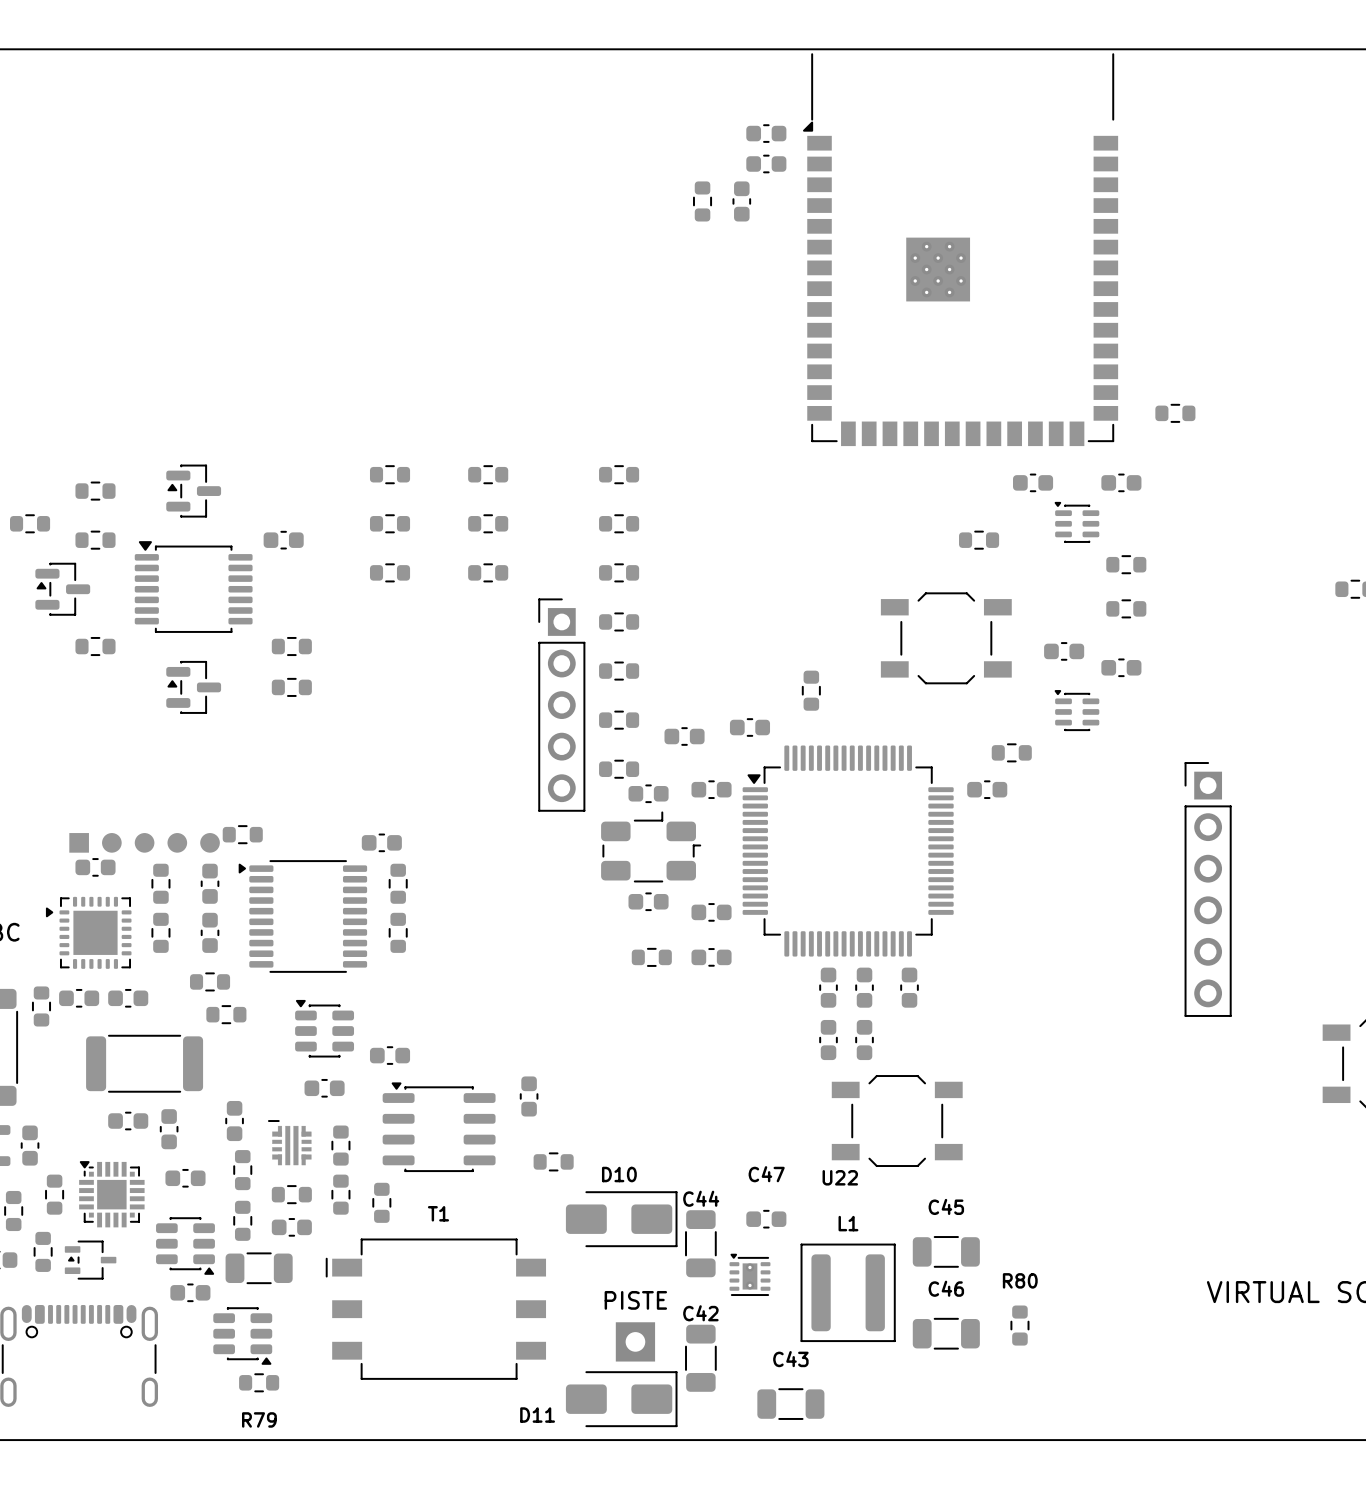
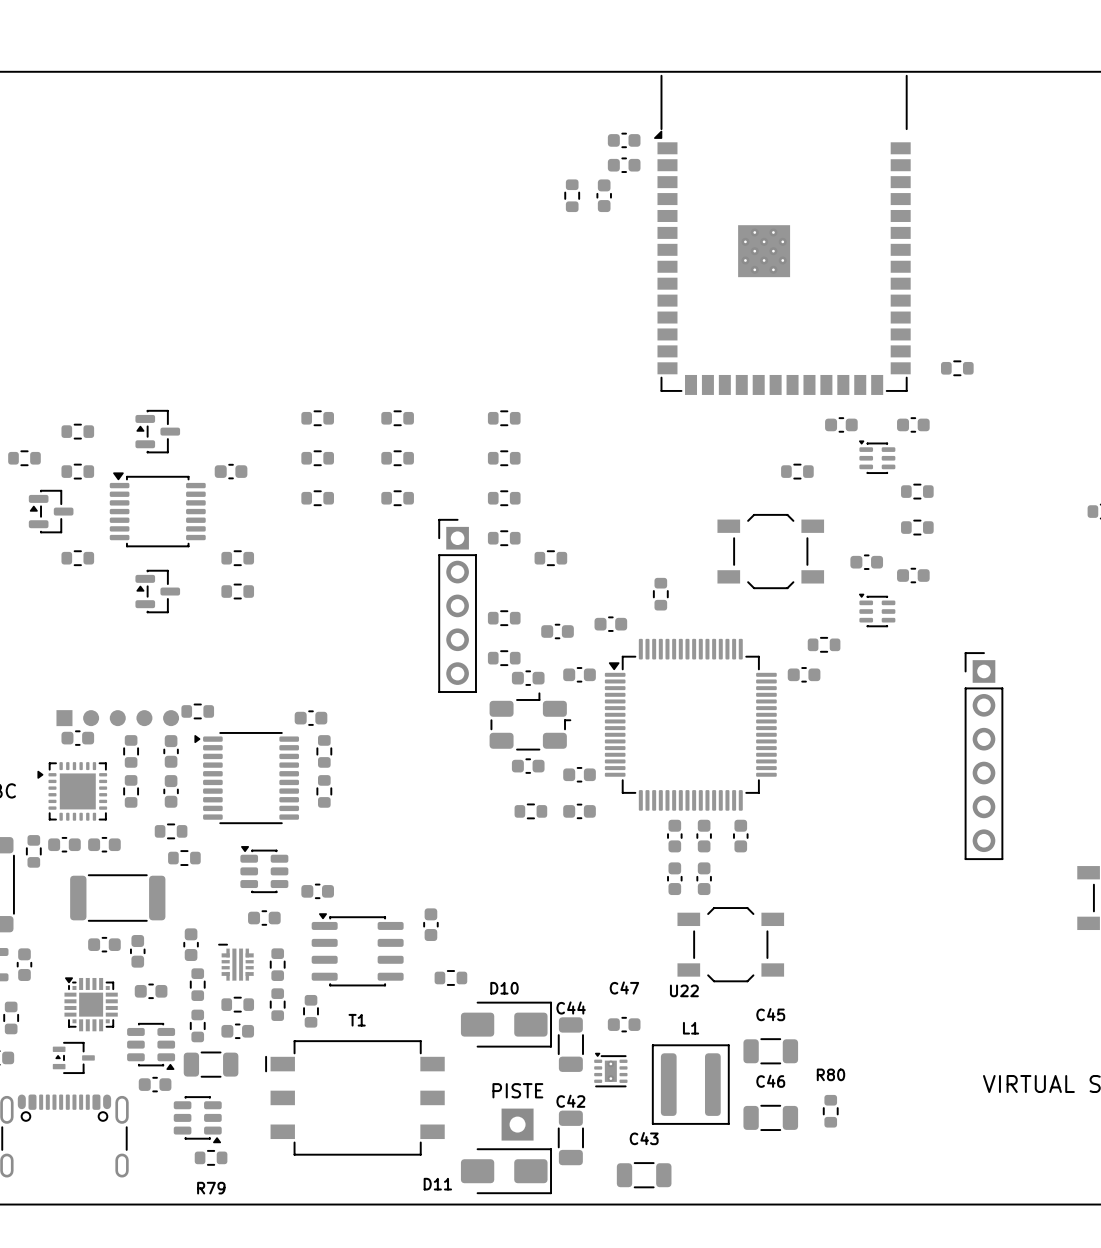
part position: (619, 671) -> (550, 558)
part: (54, 1194) -> none
part: (43, 1251) -> none

